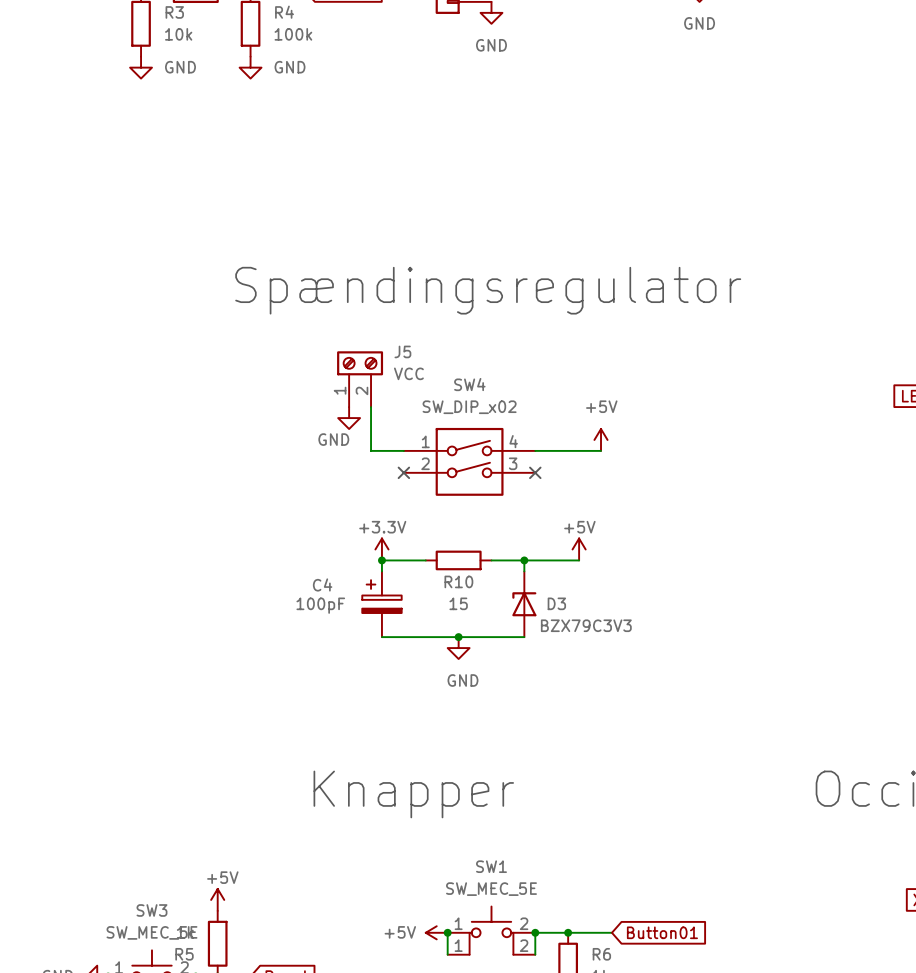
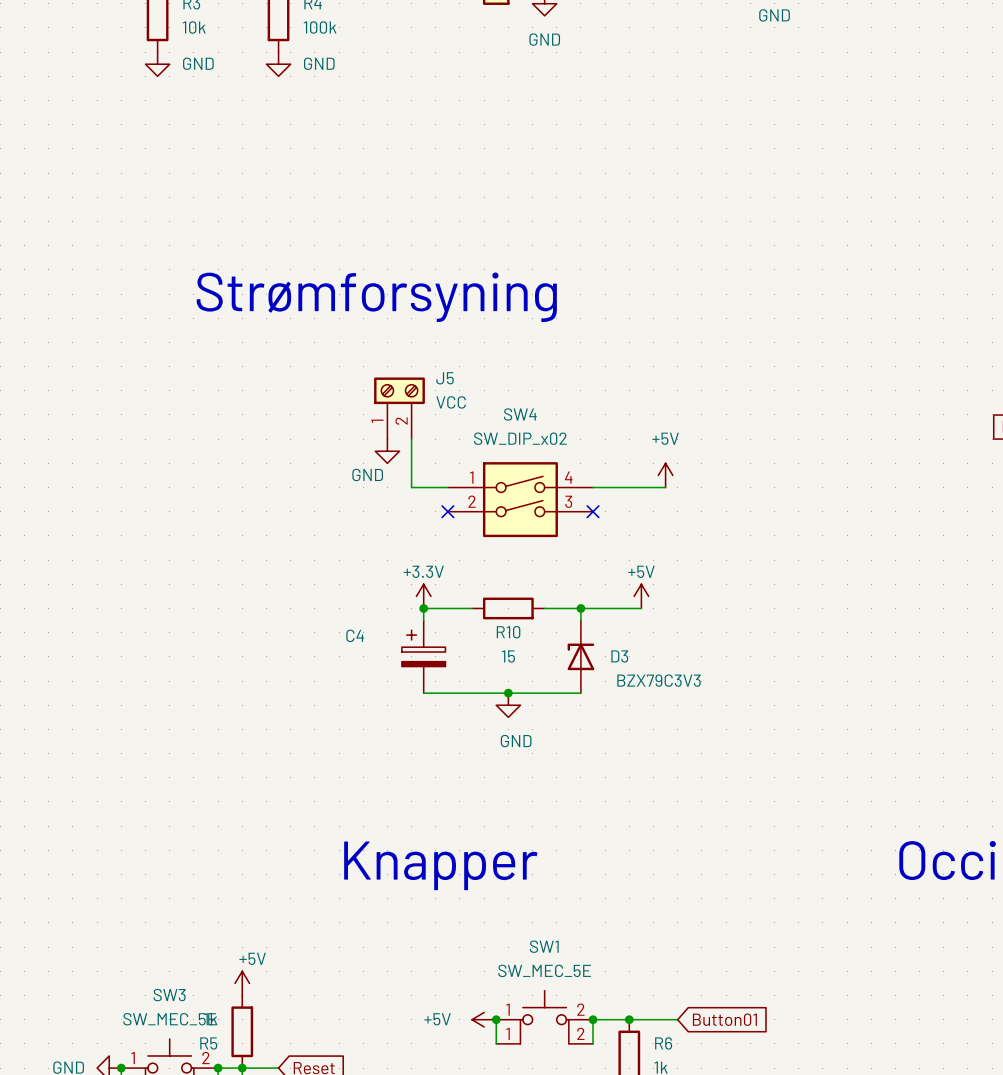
text: none -> Strømforsyning (376, 297)
text: Spændingsregulator (488, 290) -> none
C4 value: 100pF (320, 605) -> none

